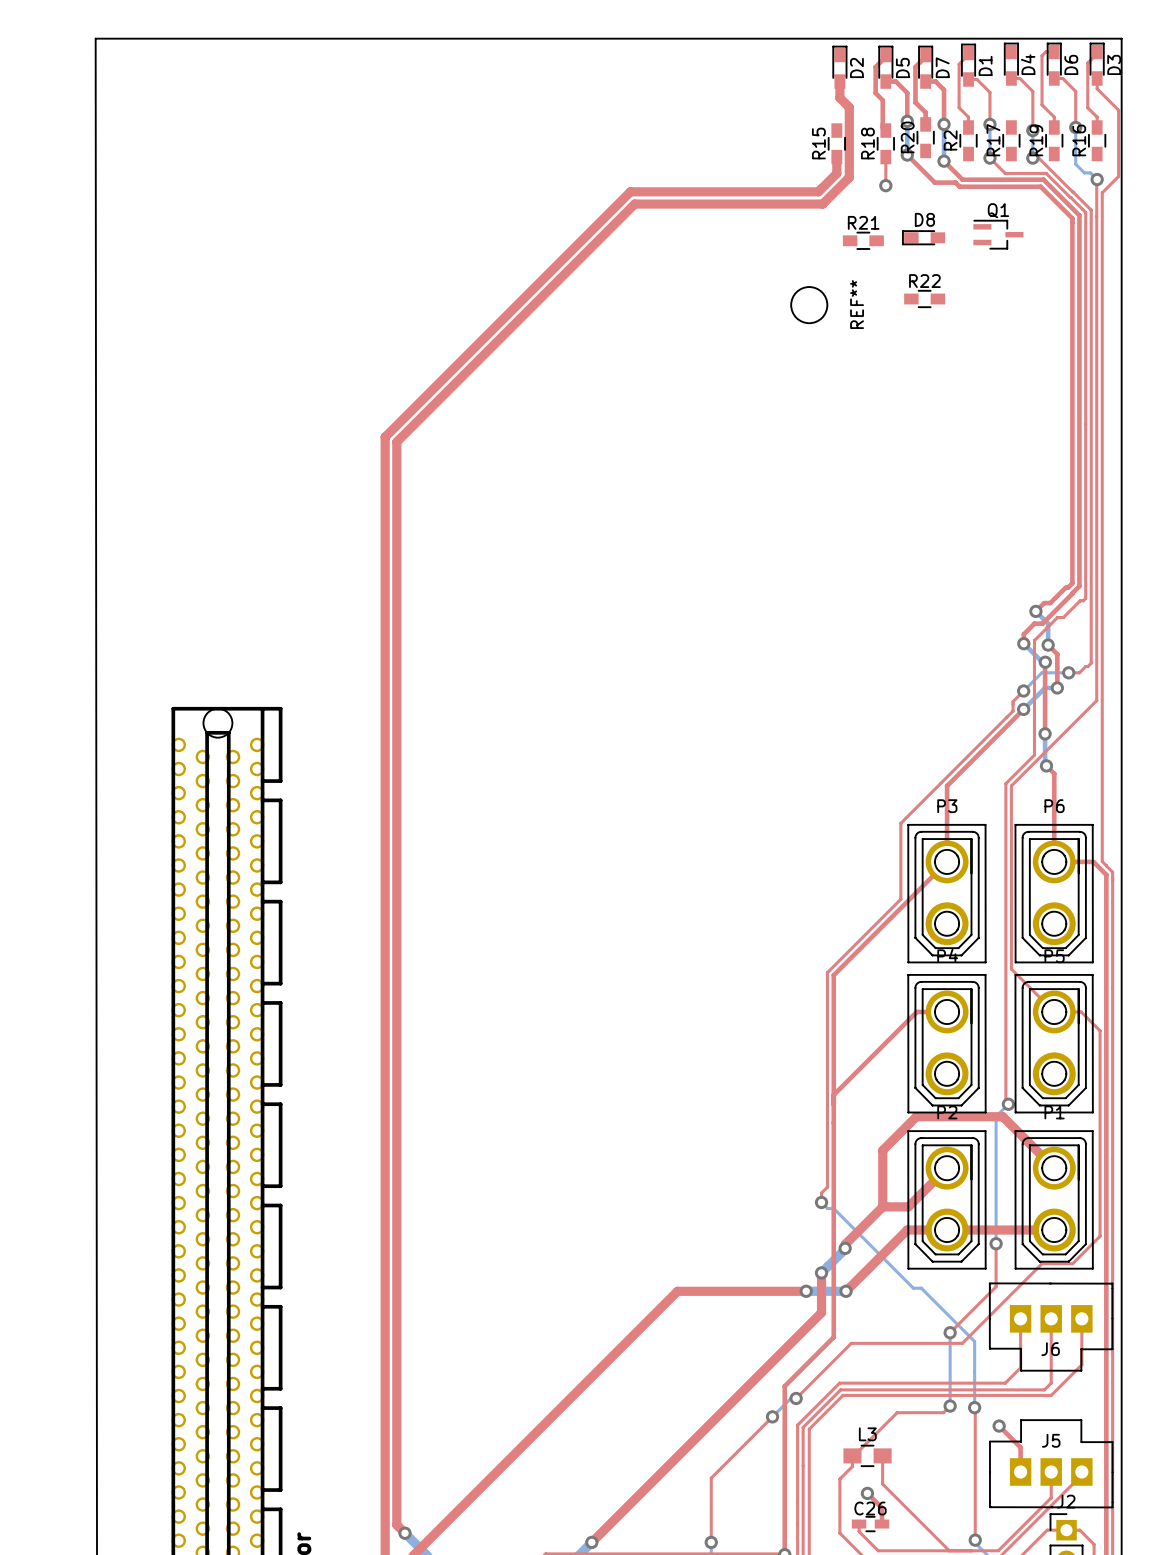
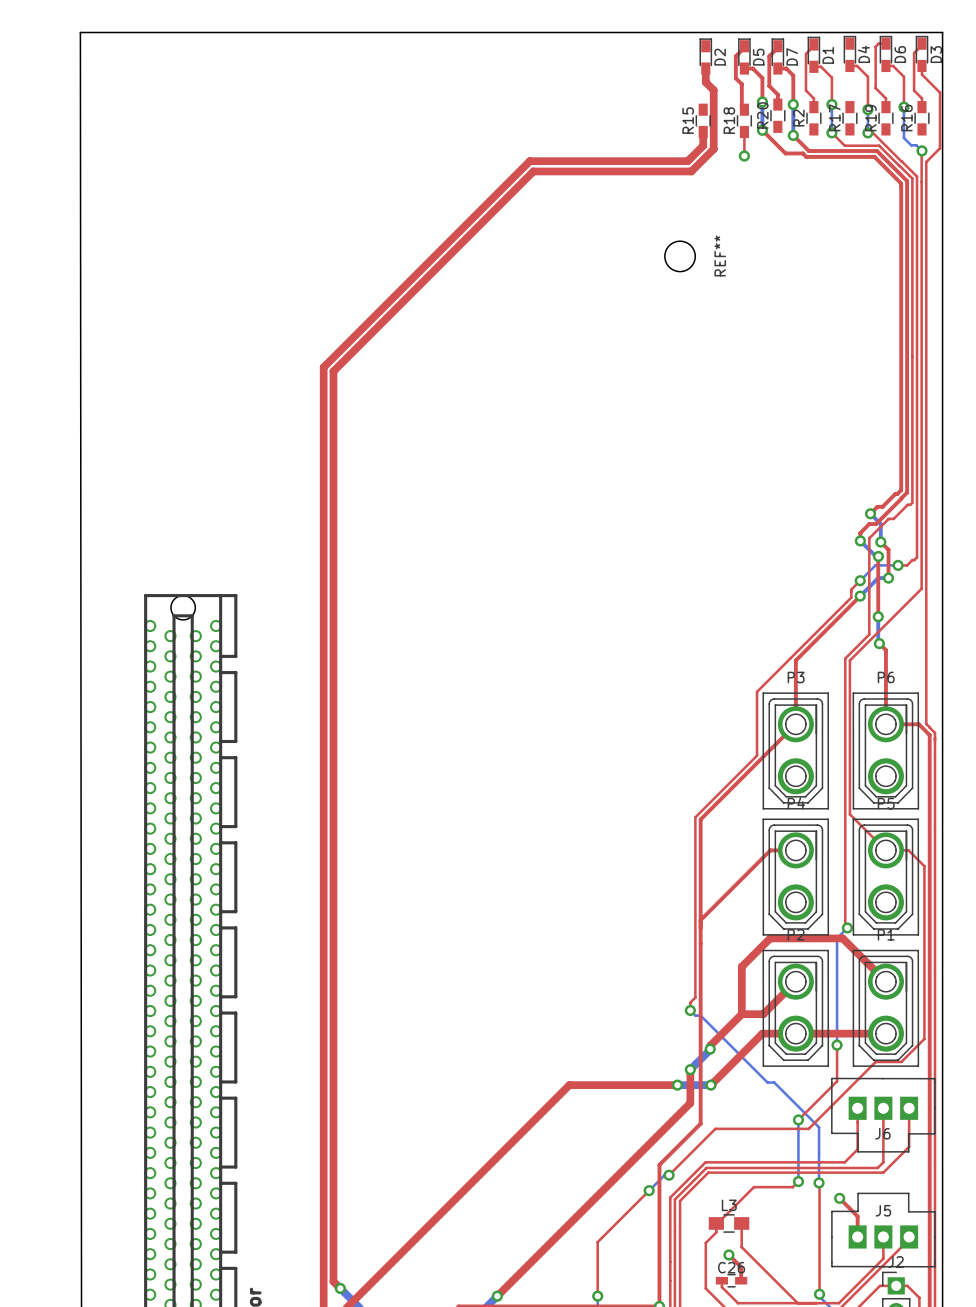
Q1: (998, 234) -> none
D8: (923, 237) -> none
R21: (863, 240) -> none
R22: (924, 298) -> none

